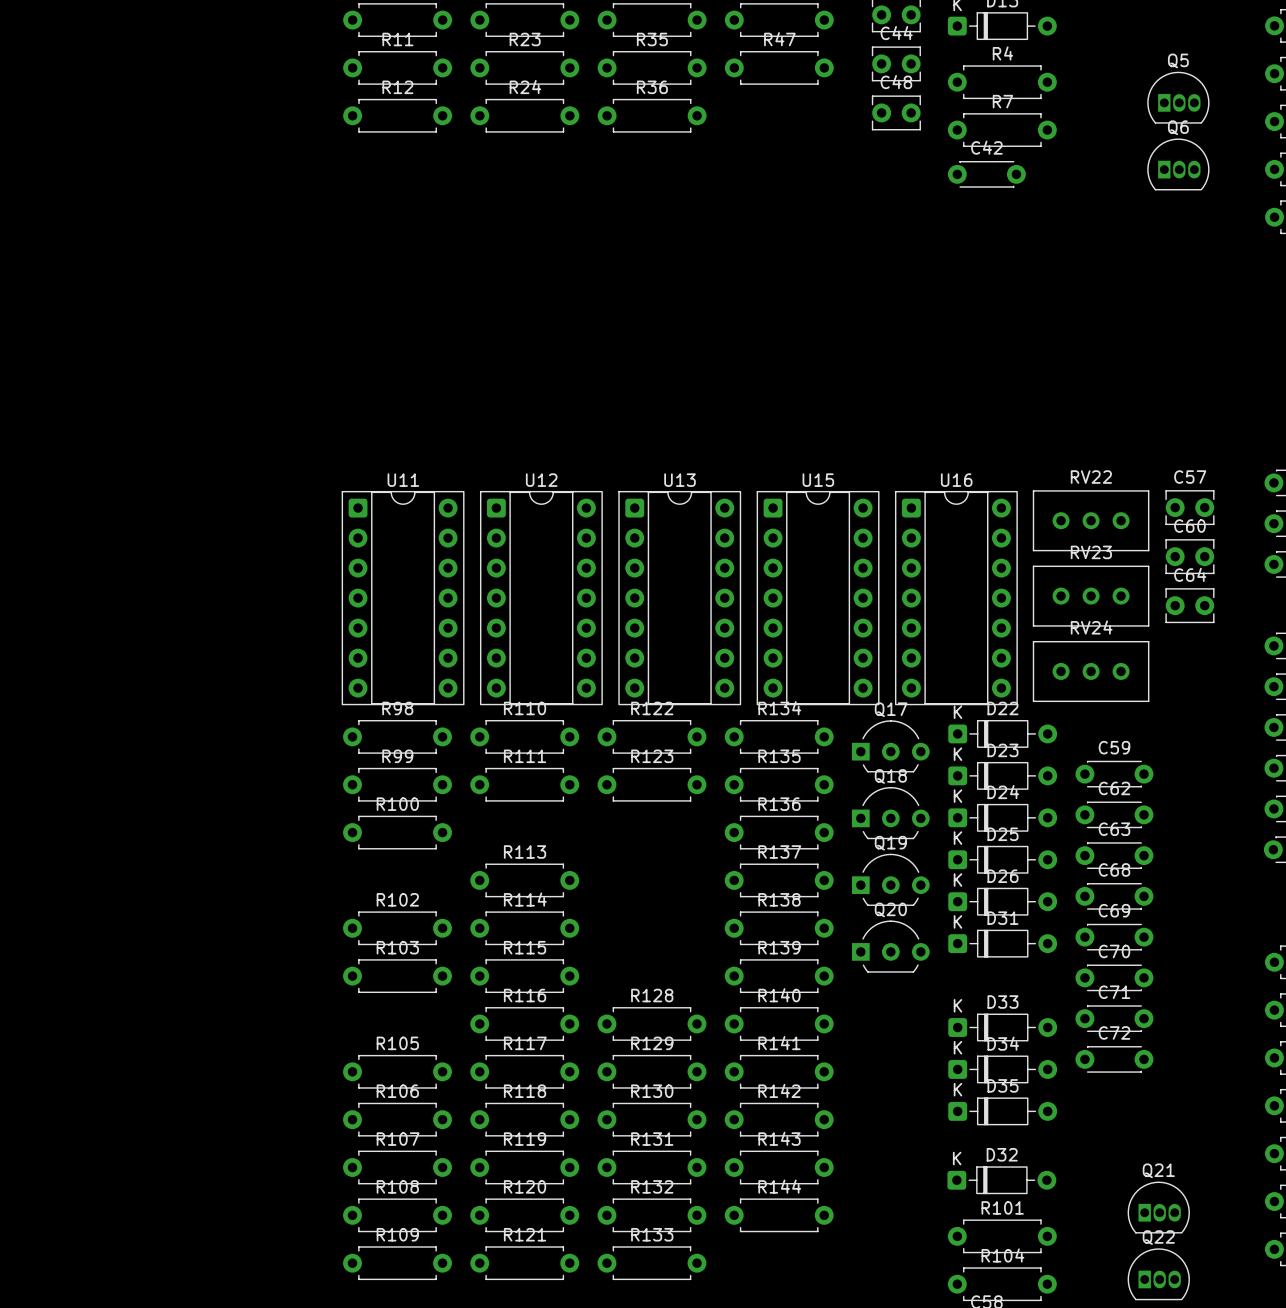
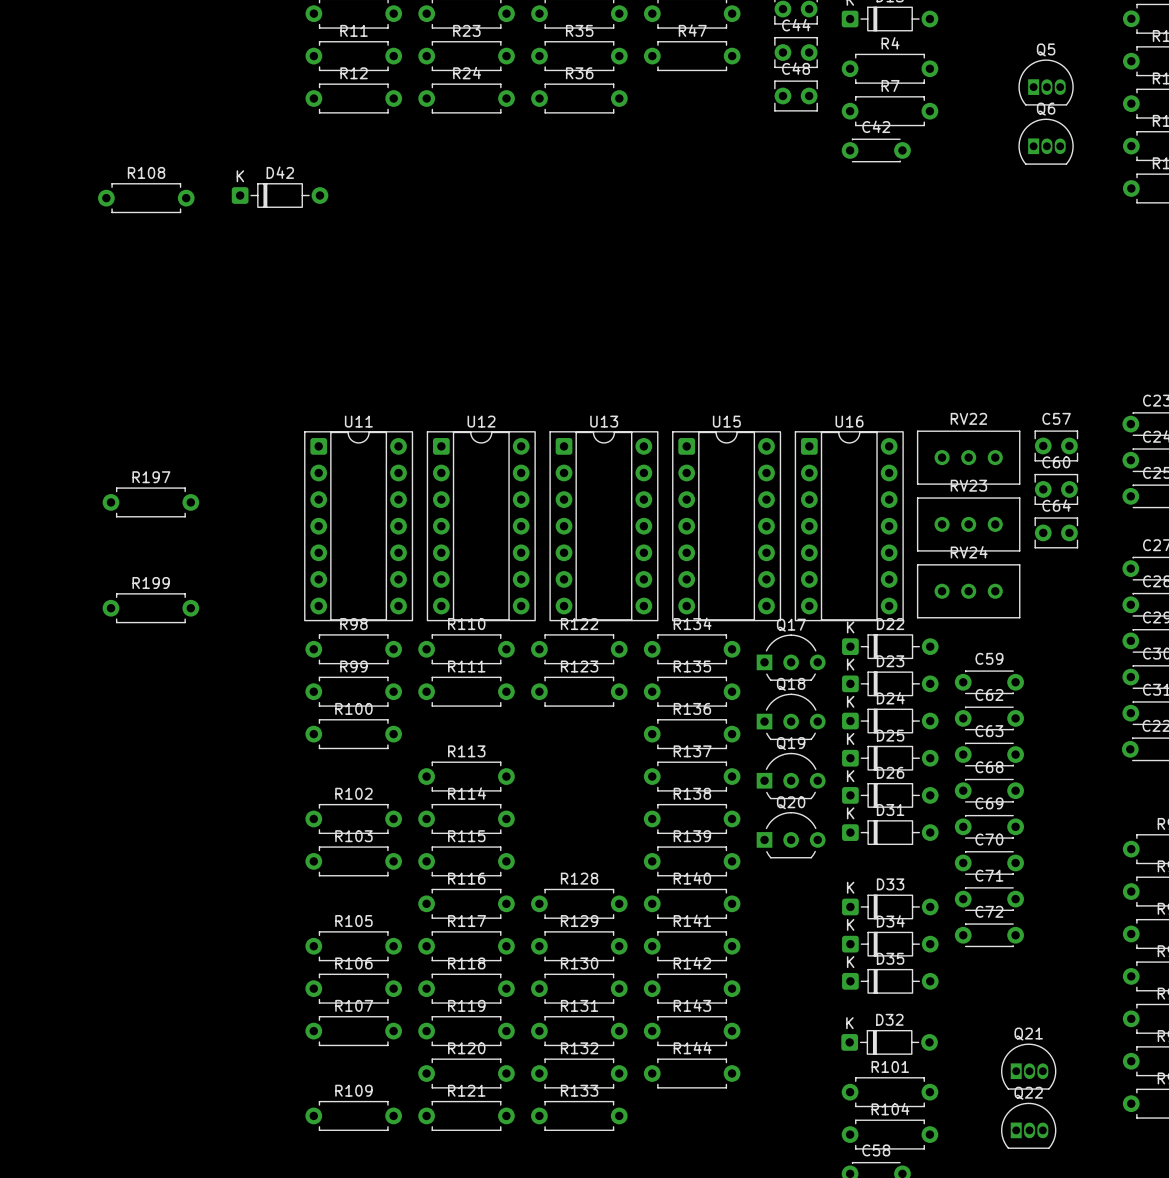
D42: none -> (280, 195)
R197: none -> (150, 502)
R199: none -> (150, 608)
R108 position: (397, 1215) -> (146, 198)

